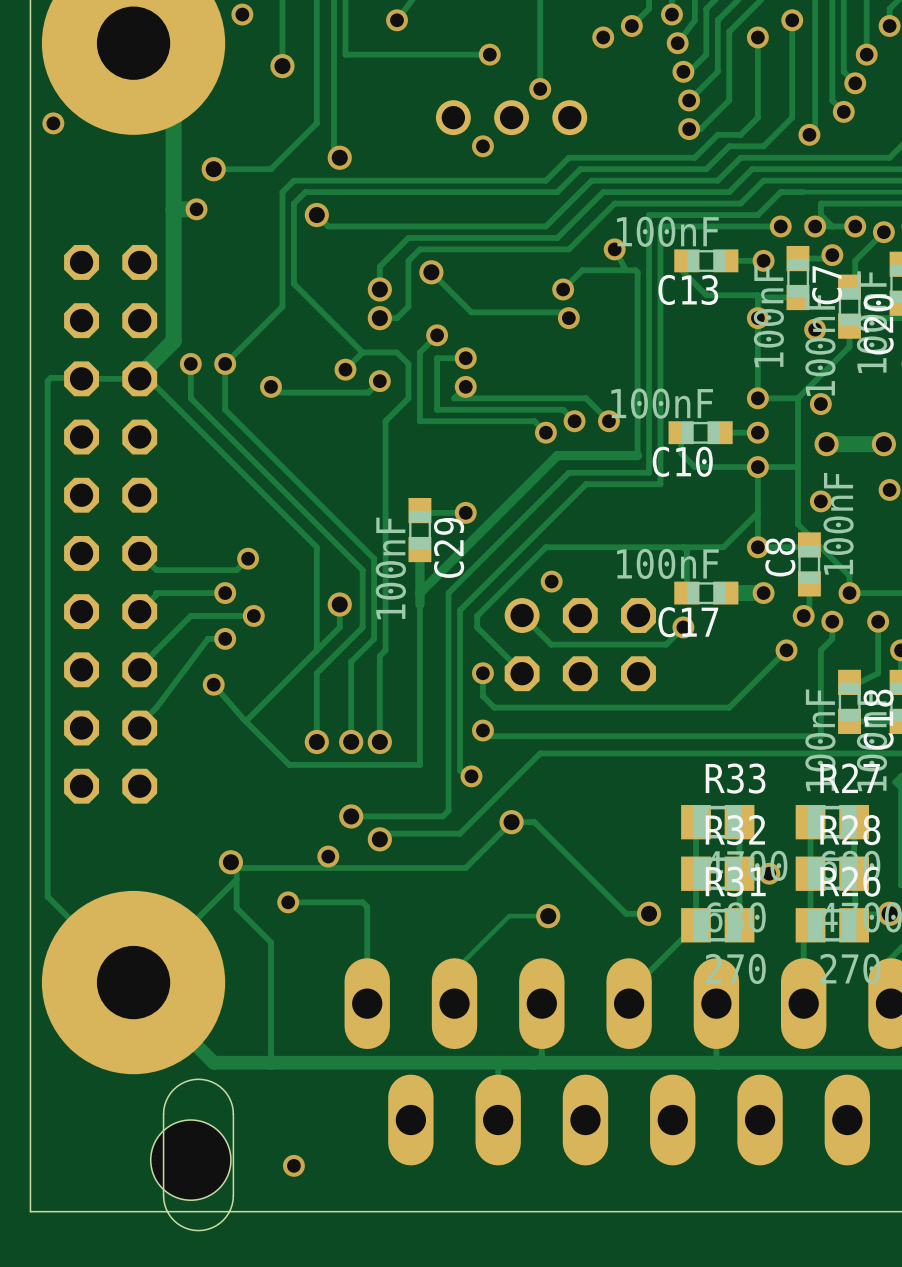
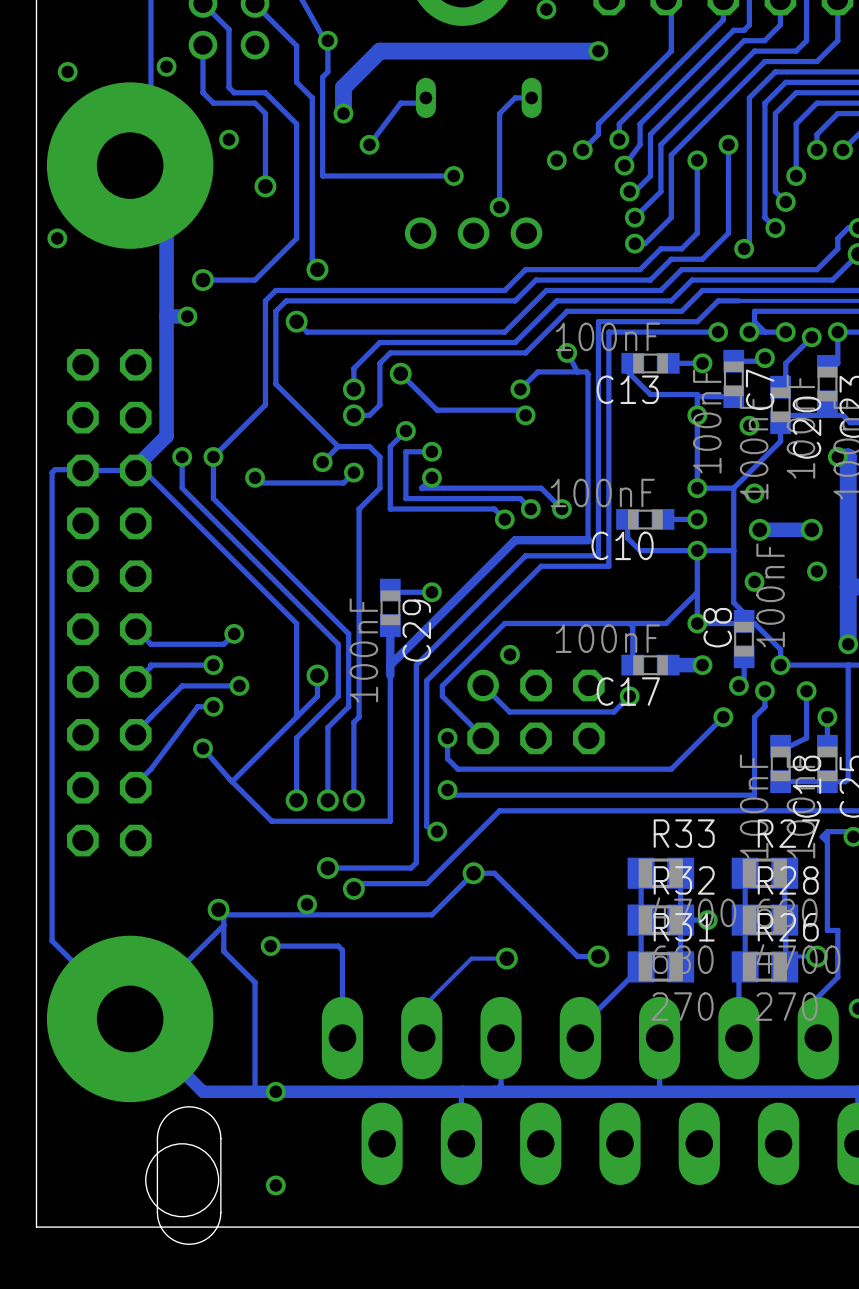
via: (482, 146) -> none
via: none -> (275, 1091)

